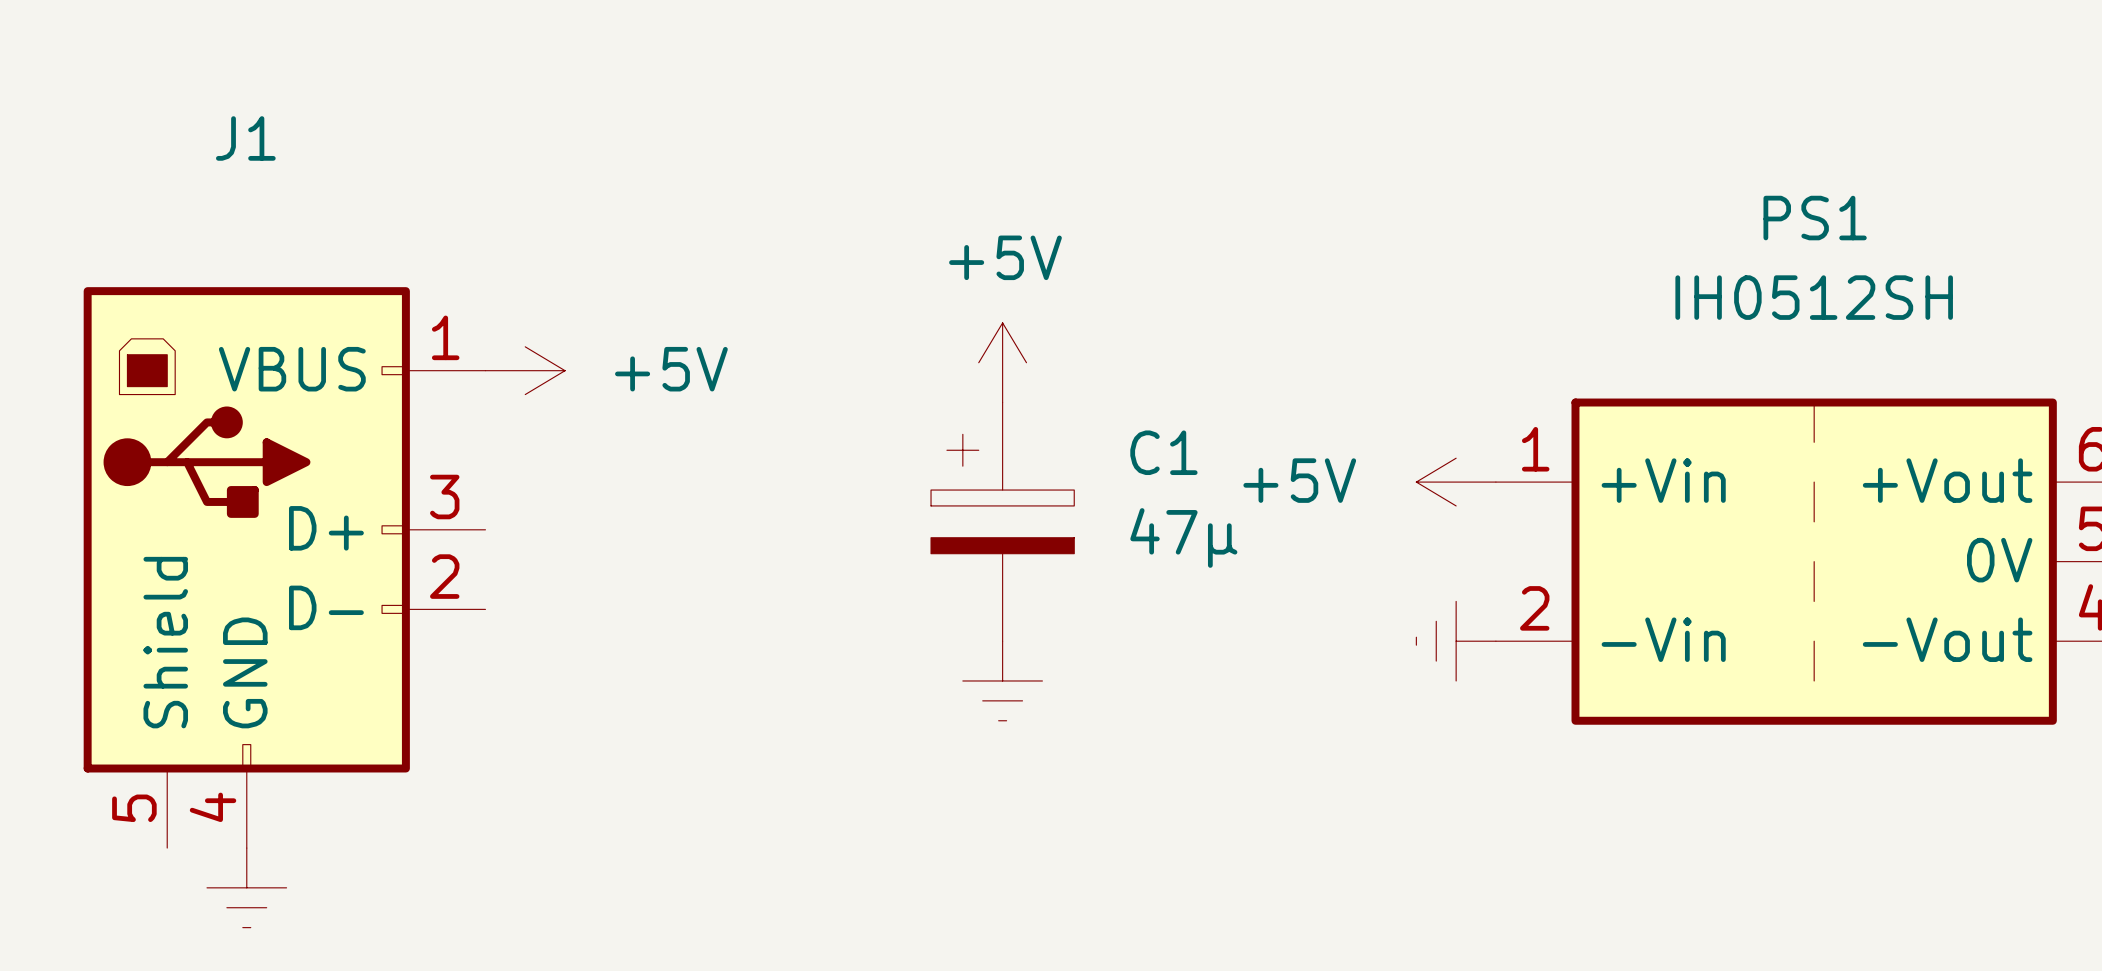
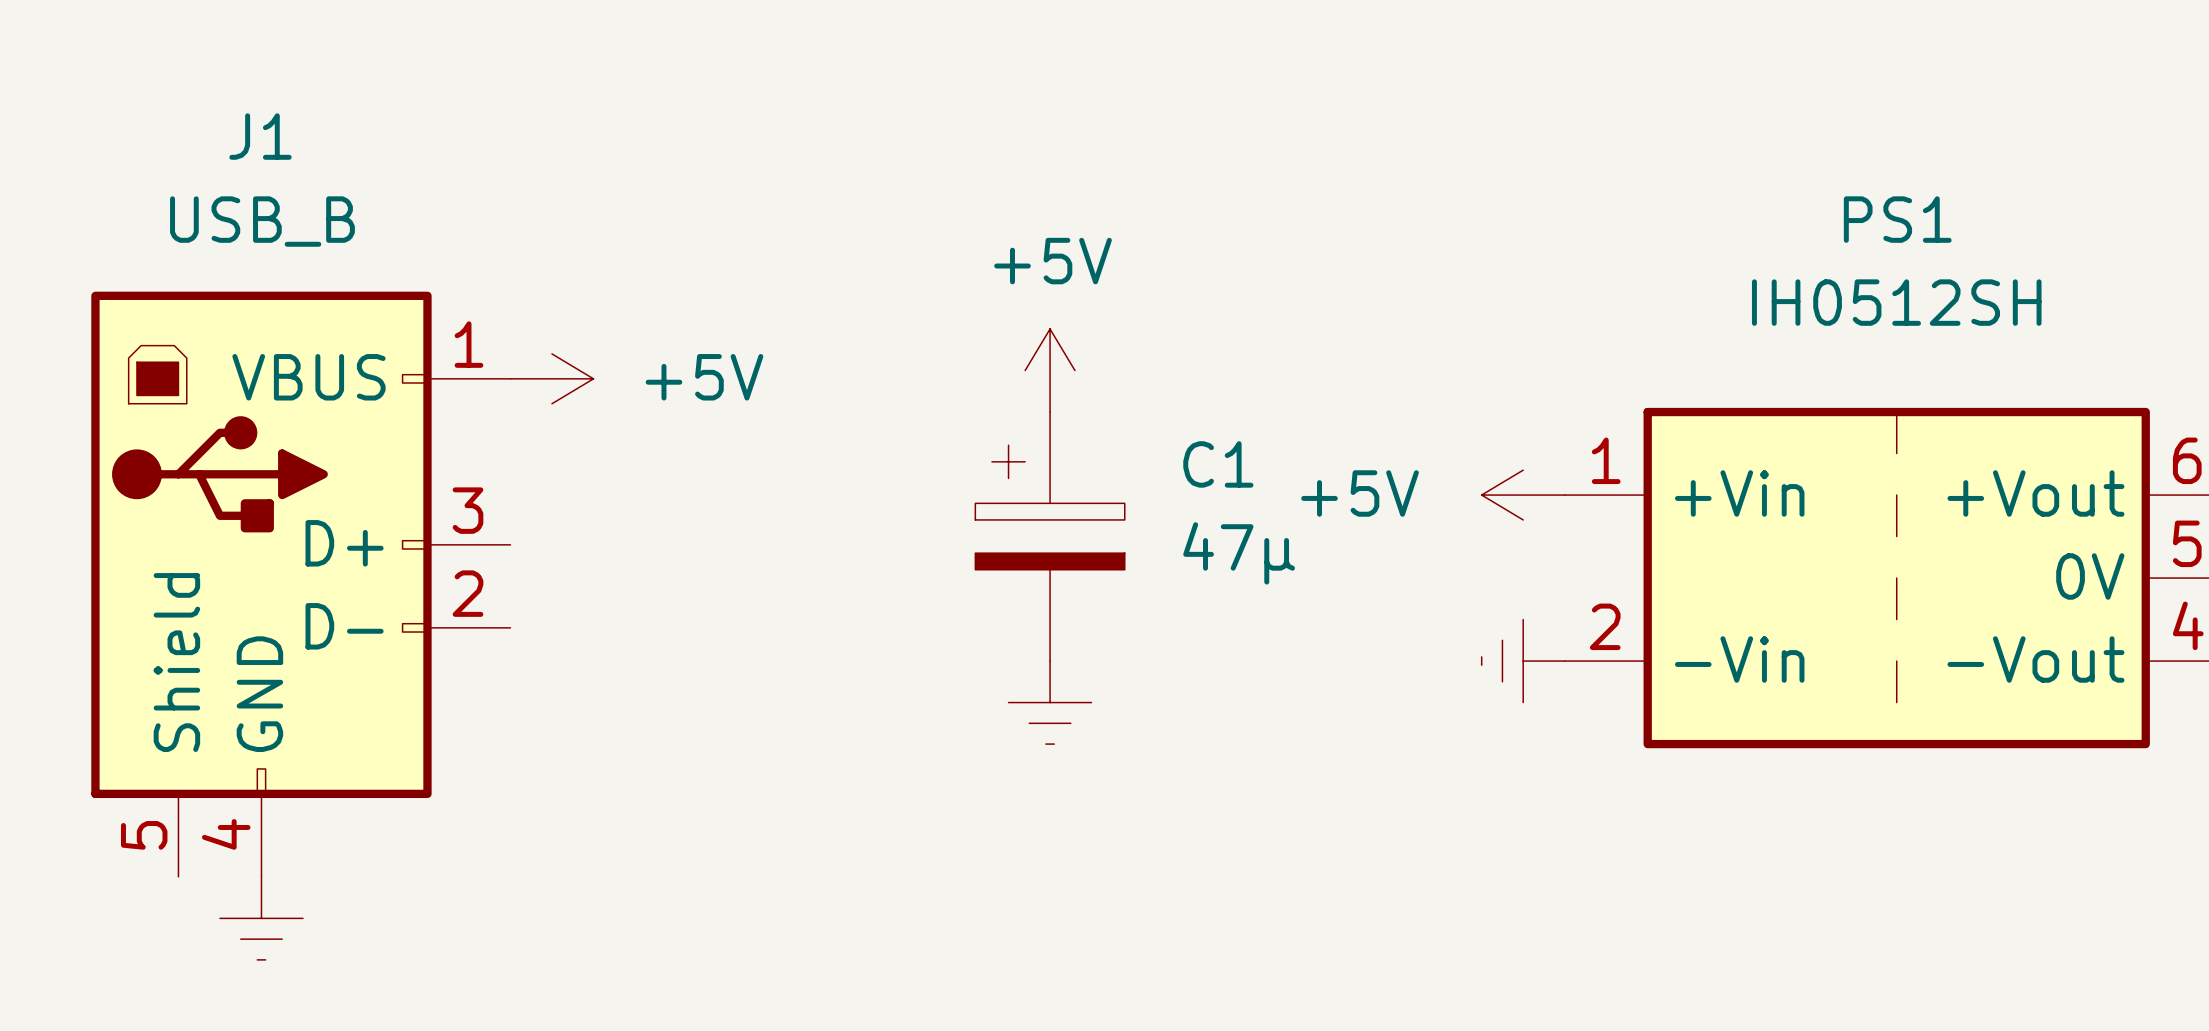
J1 value: none -> USB_B (262, 221)

